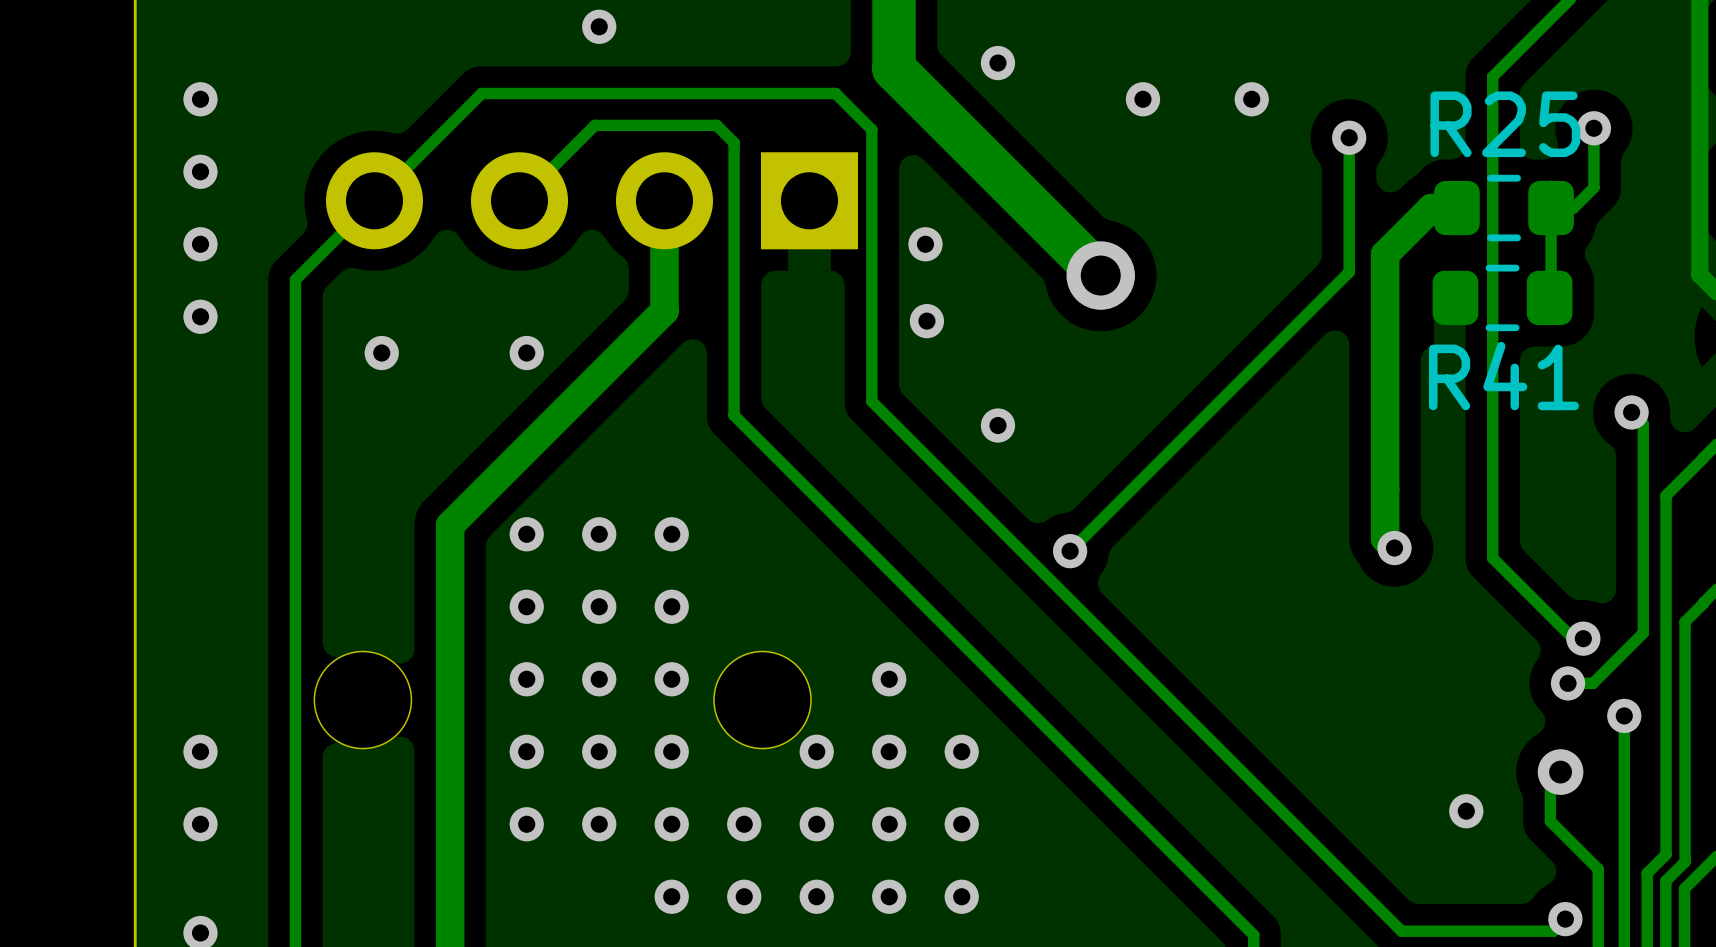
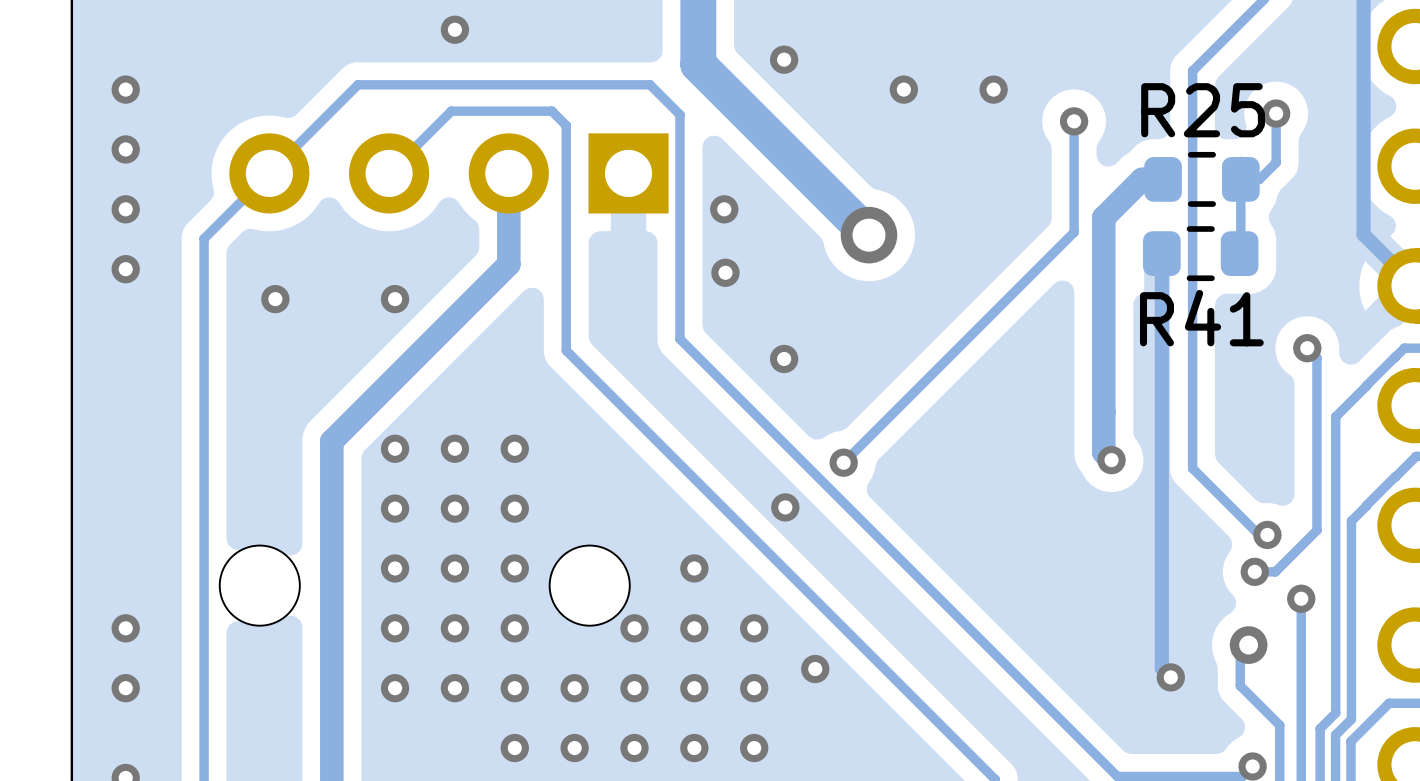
track: none -> (1161, 253) (1161, 668) (1170, 677)
via: none -> (785, 507)
via: none -> (815, 669)

